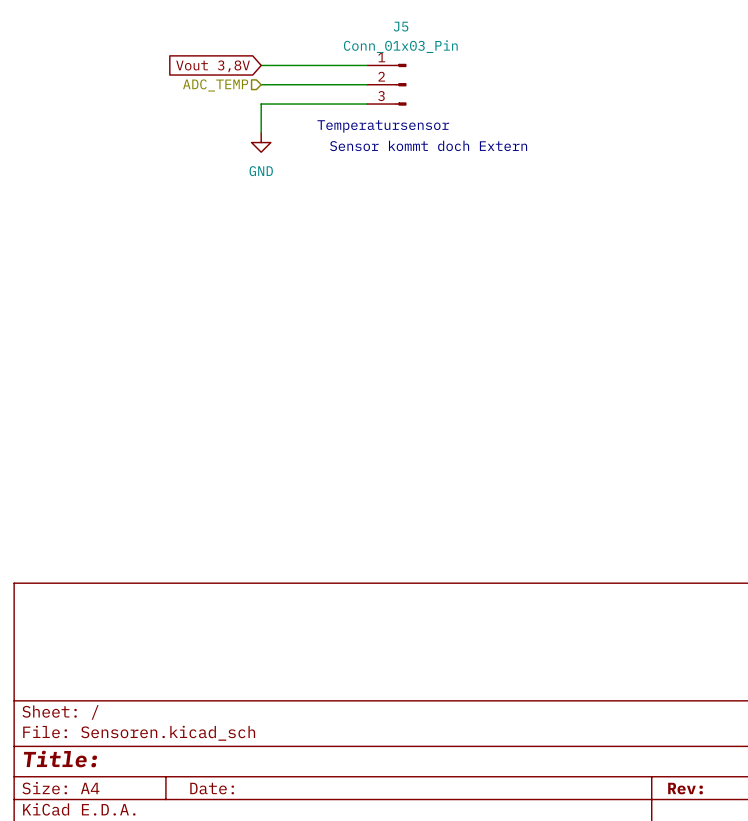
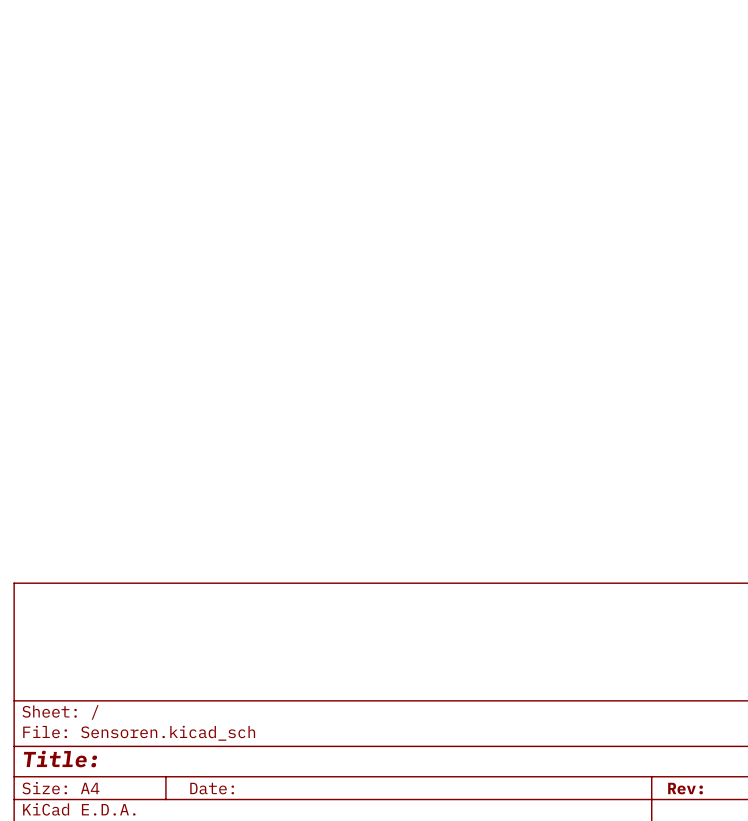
wire: (261, 65) (367, 65) -> none
global label: Vout 3,8V (213, 66) -> none
wire: (261, 84) (367, 84) -> none
J5: Conn_01x03_Pin (386, 84) -> none
hierarchical label: ADC_TEMP (215, 85) -> none
wire: (367, 104) (261, 104) (261, 132) -> none
text: Temperatursensor (383, 126) -> none
power symbol: GND (261, 142) -> none
text: Sensor kommt doch Extern (428, 145) -> none

